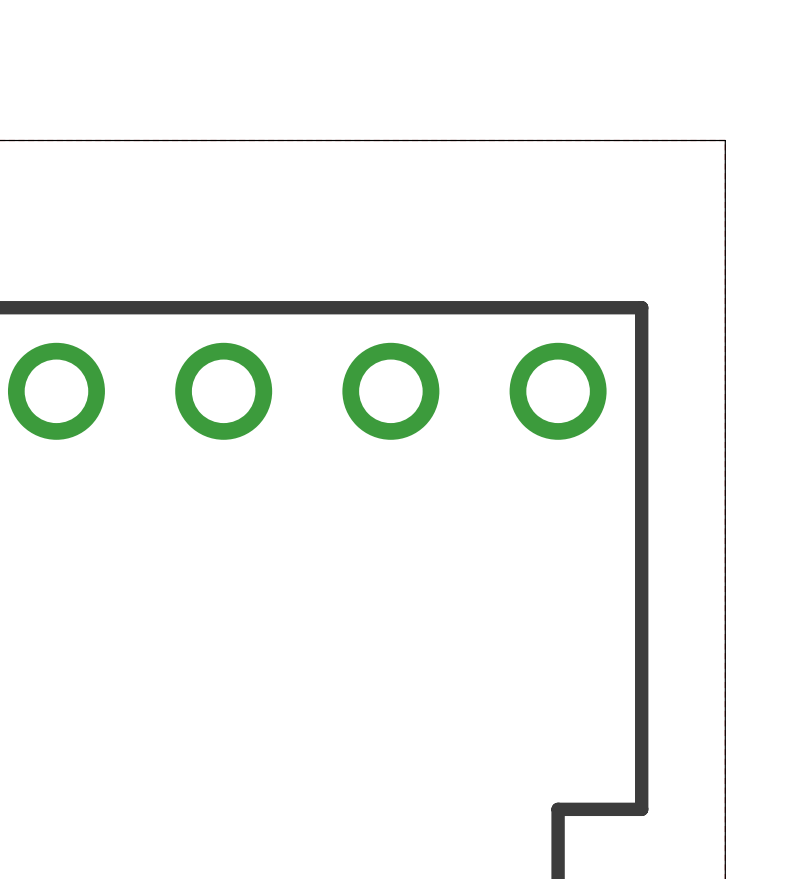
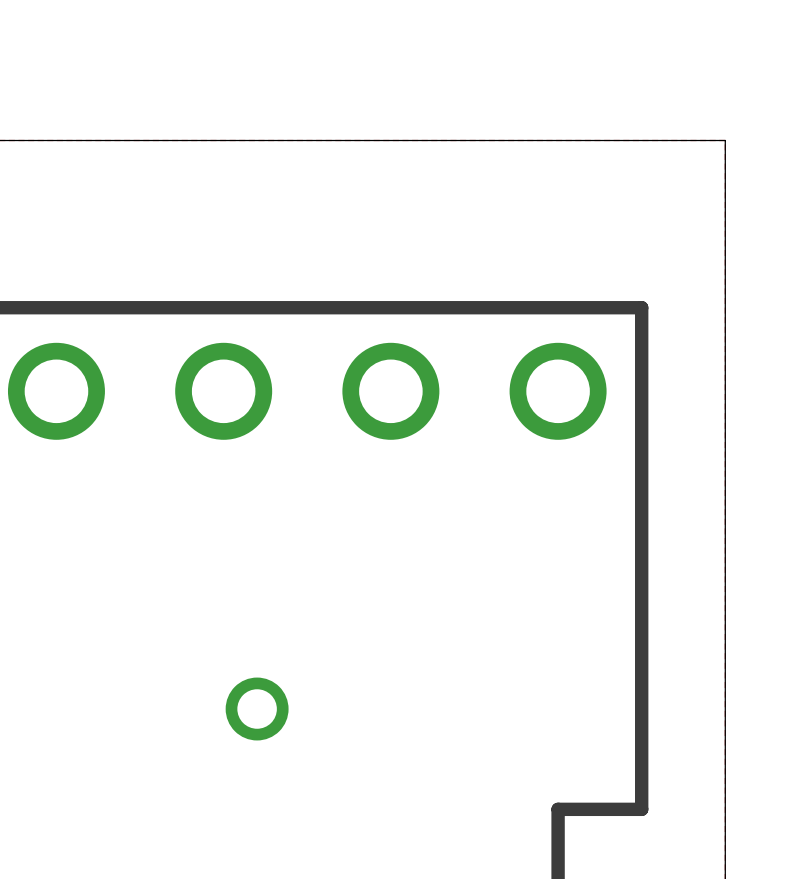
via: none -> (257, 709)

